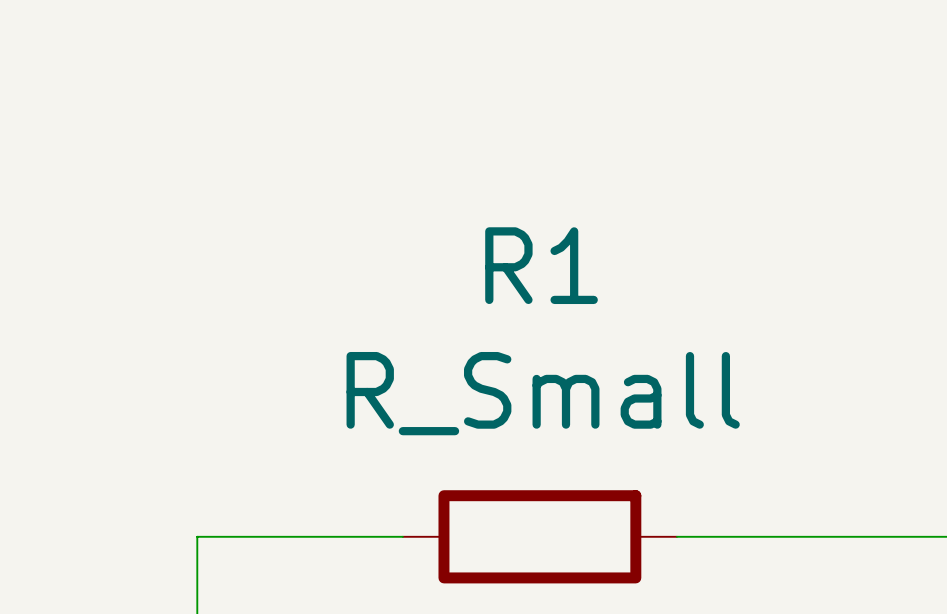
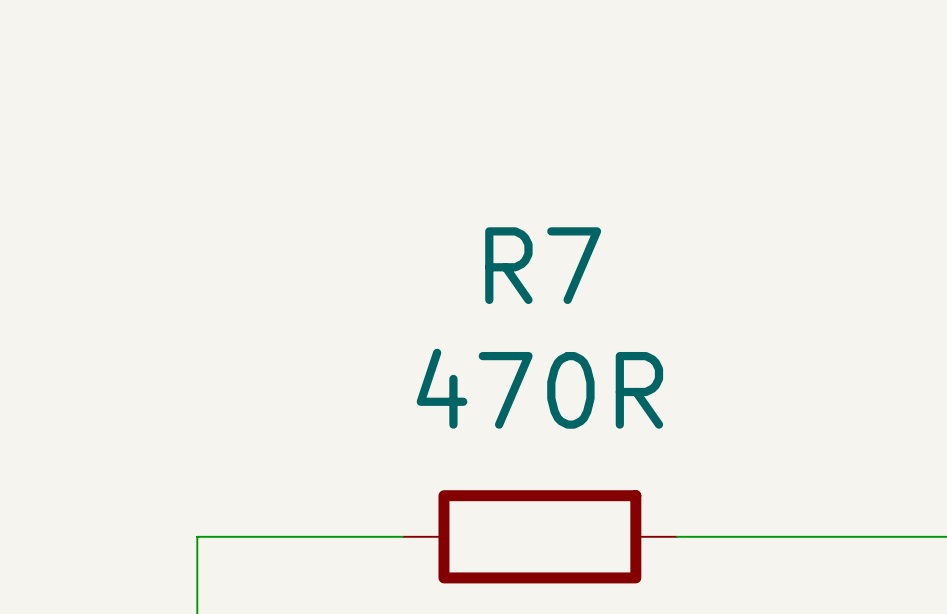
R1 name: R1 (541, 265) -> R7 (543, 265)
R1 value: R_Small (543, 393) -> 470R (539, 388)

